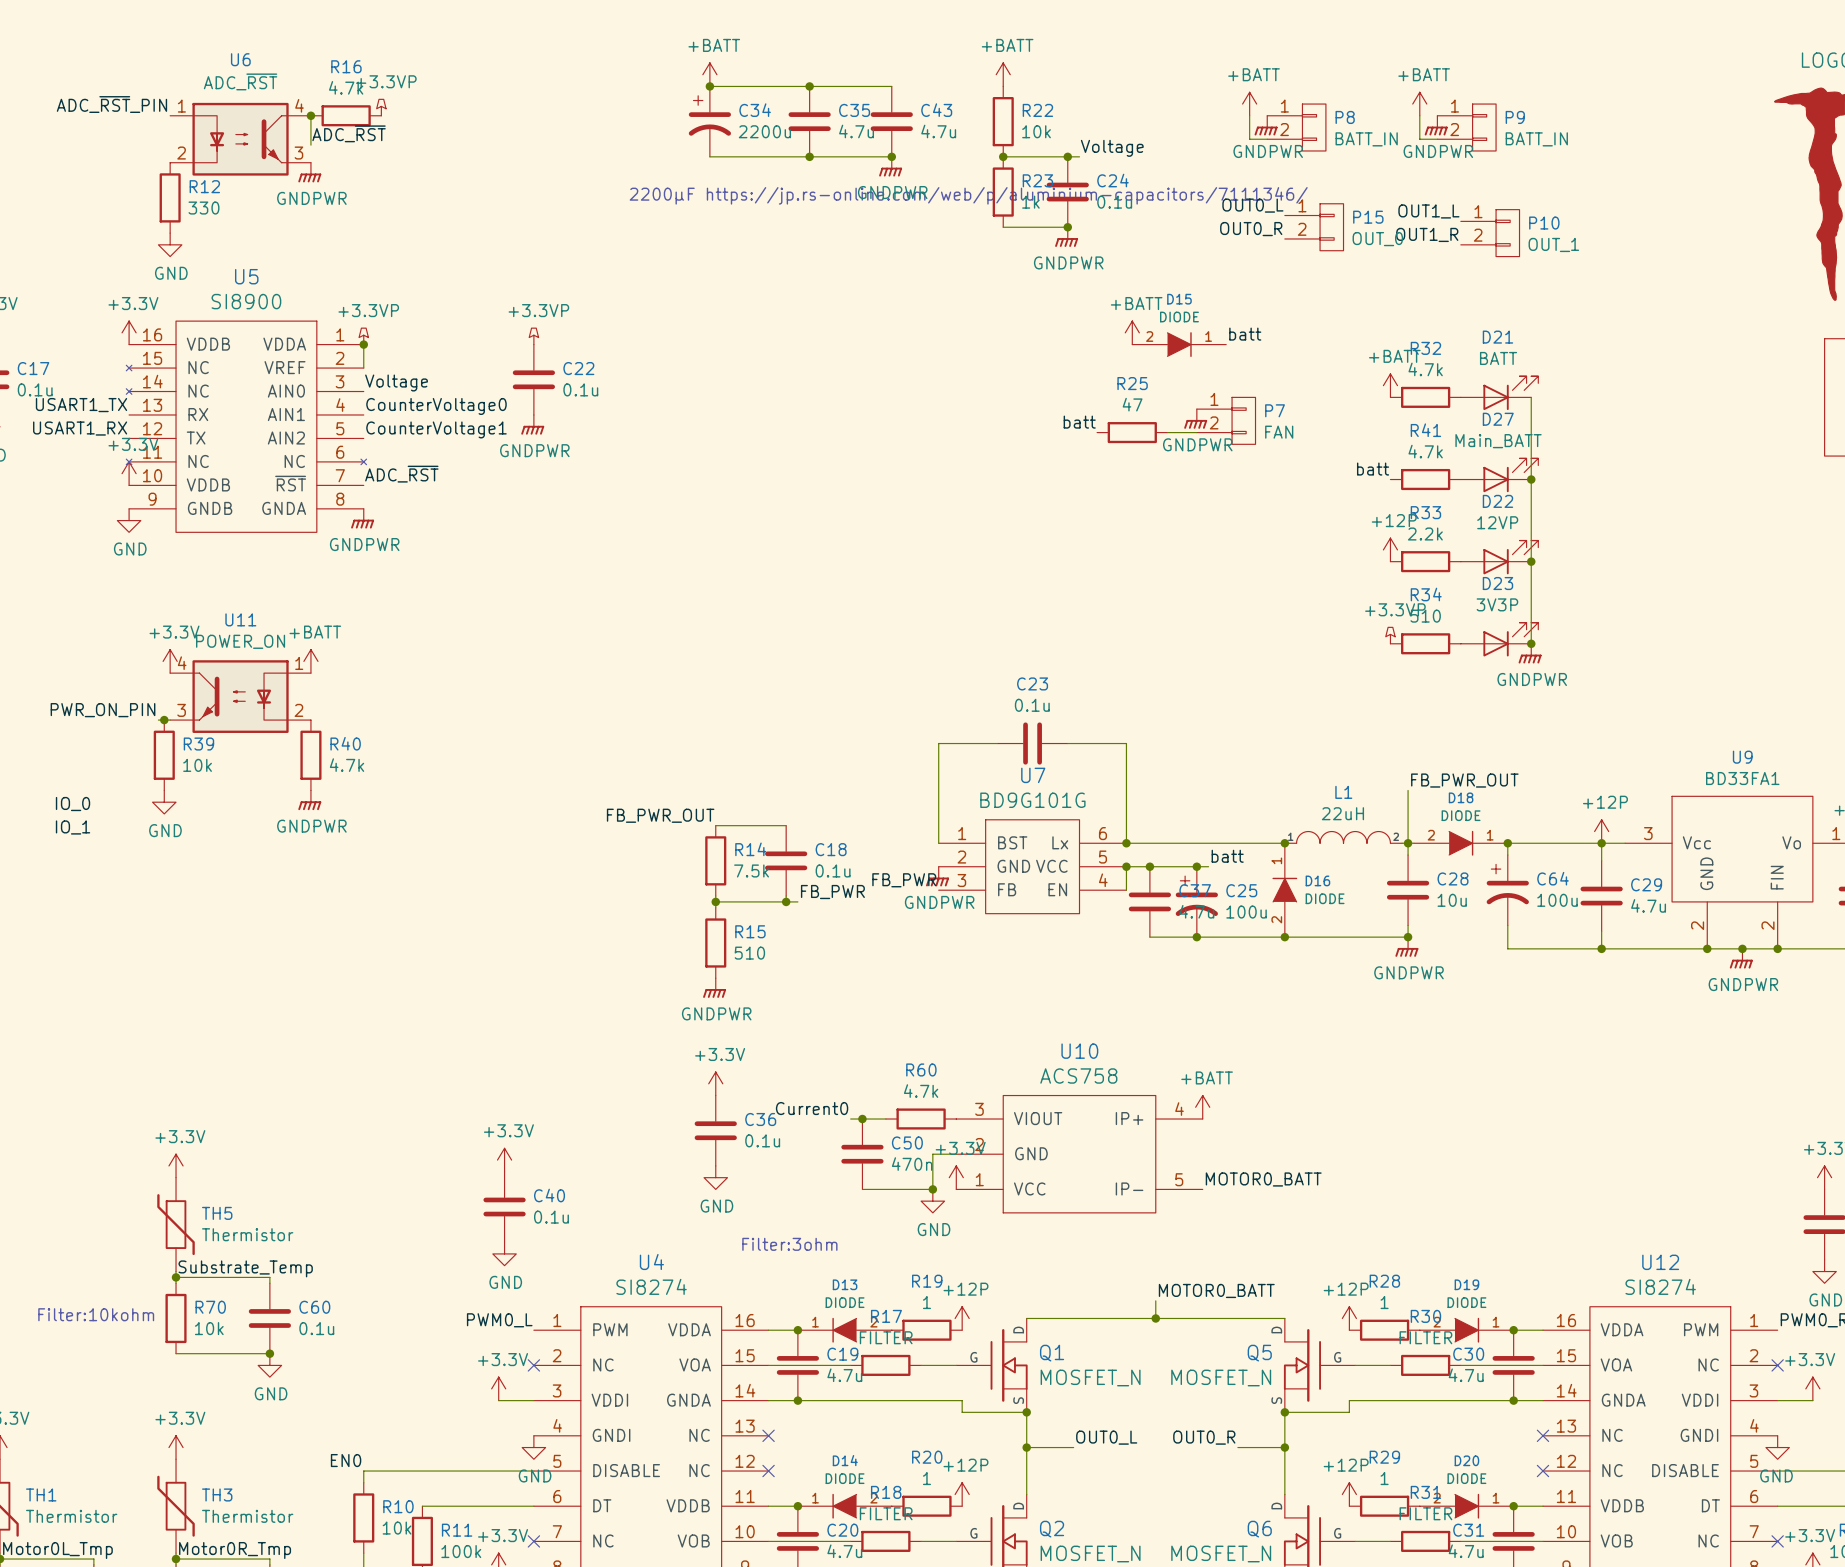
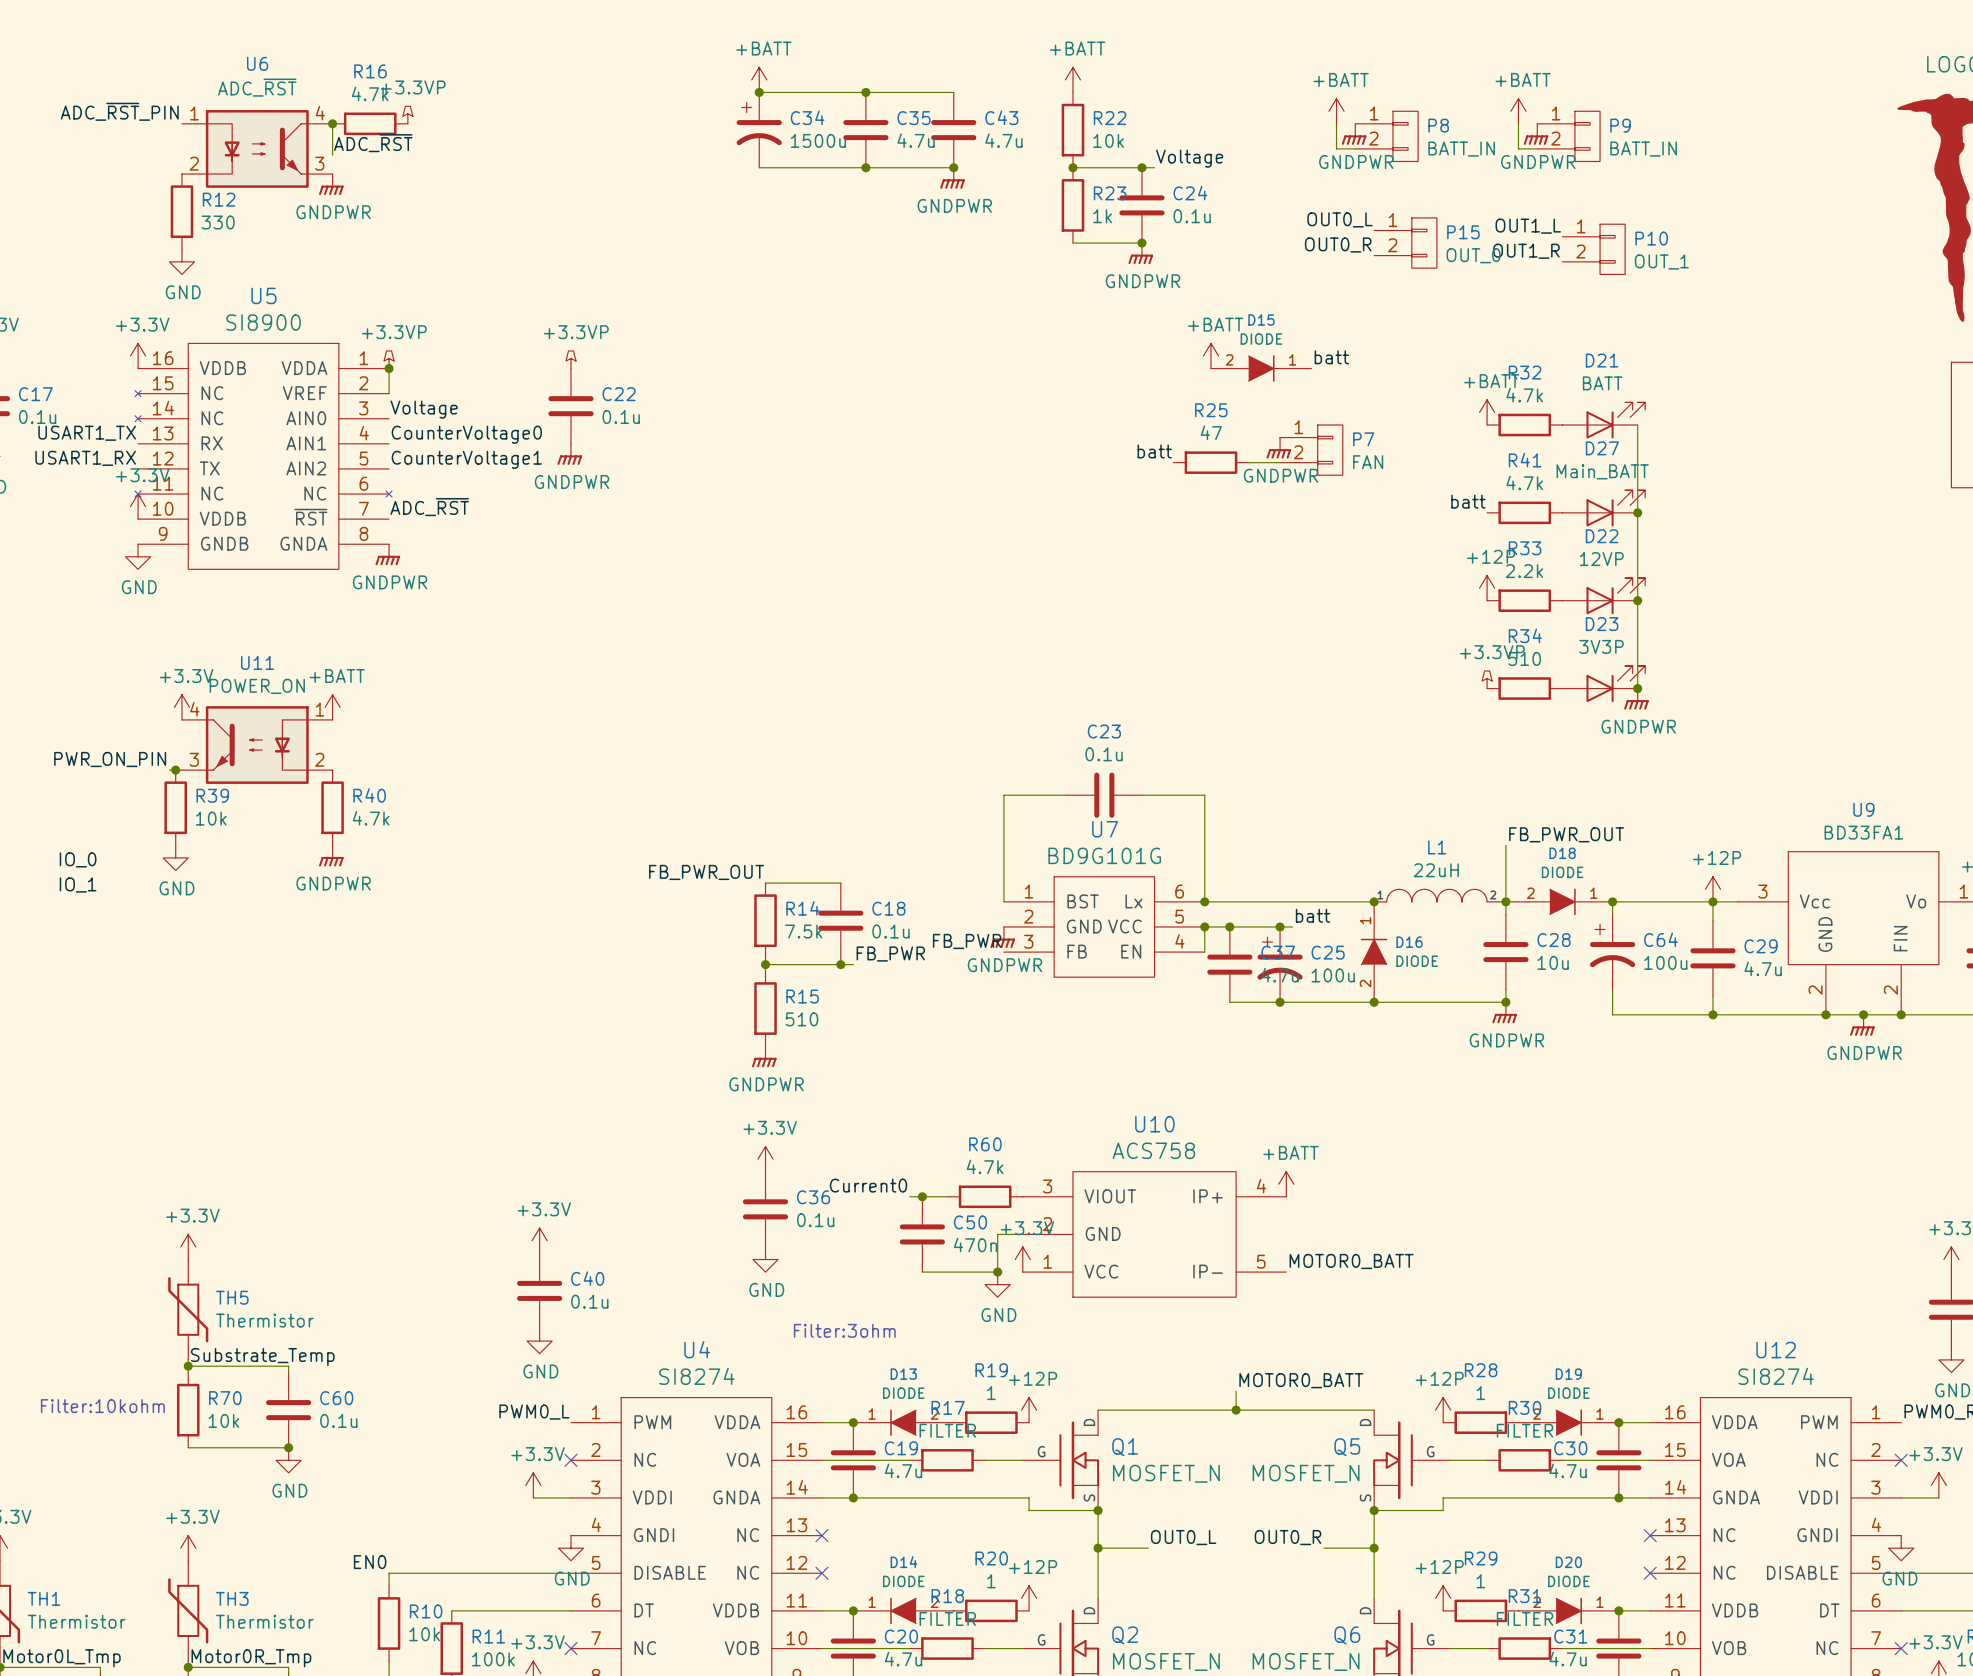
C34 value: 2200u (764, 131) -> 1500u (818, 140)
text: 2200μF https://jp.rs-online.com/web/p/aluminium-capacitors/7111346/ (968, 195) -> none

